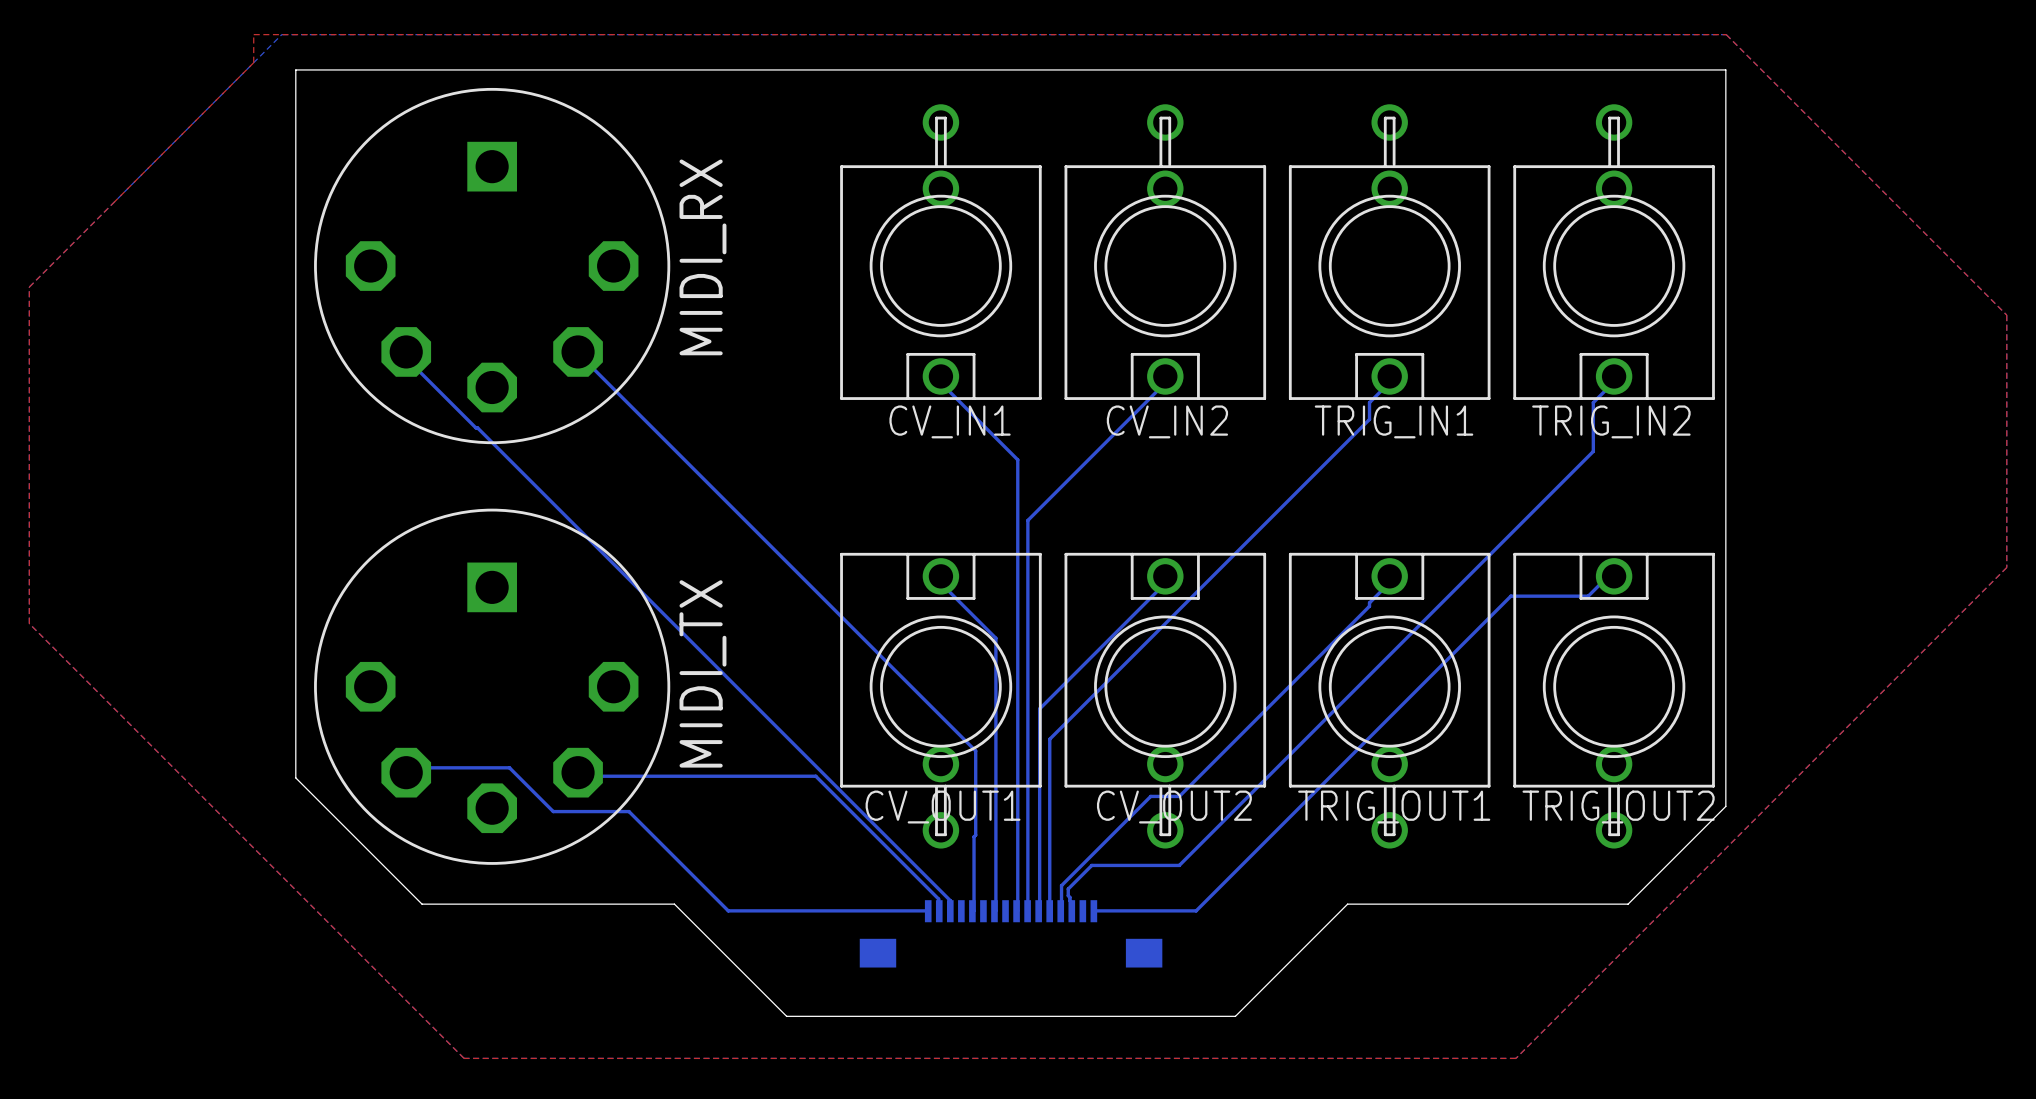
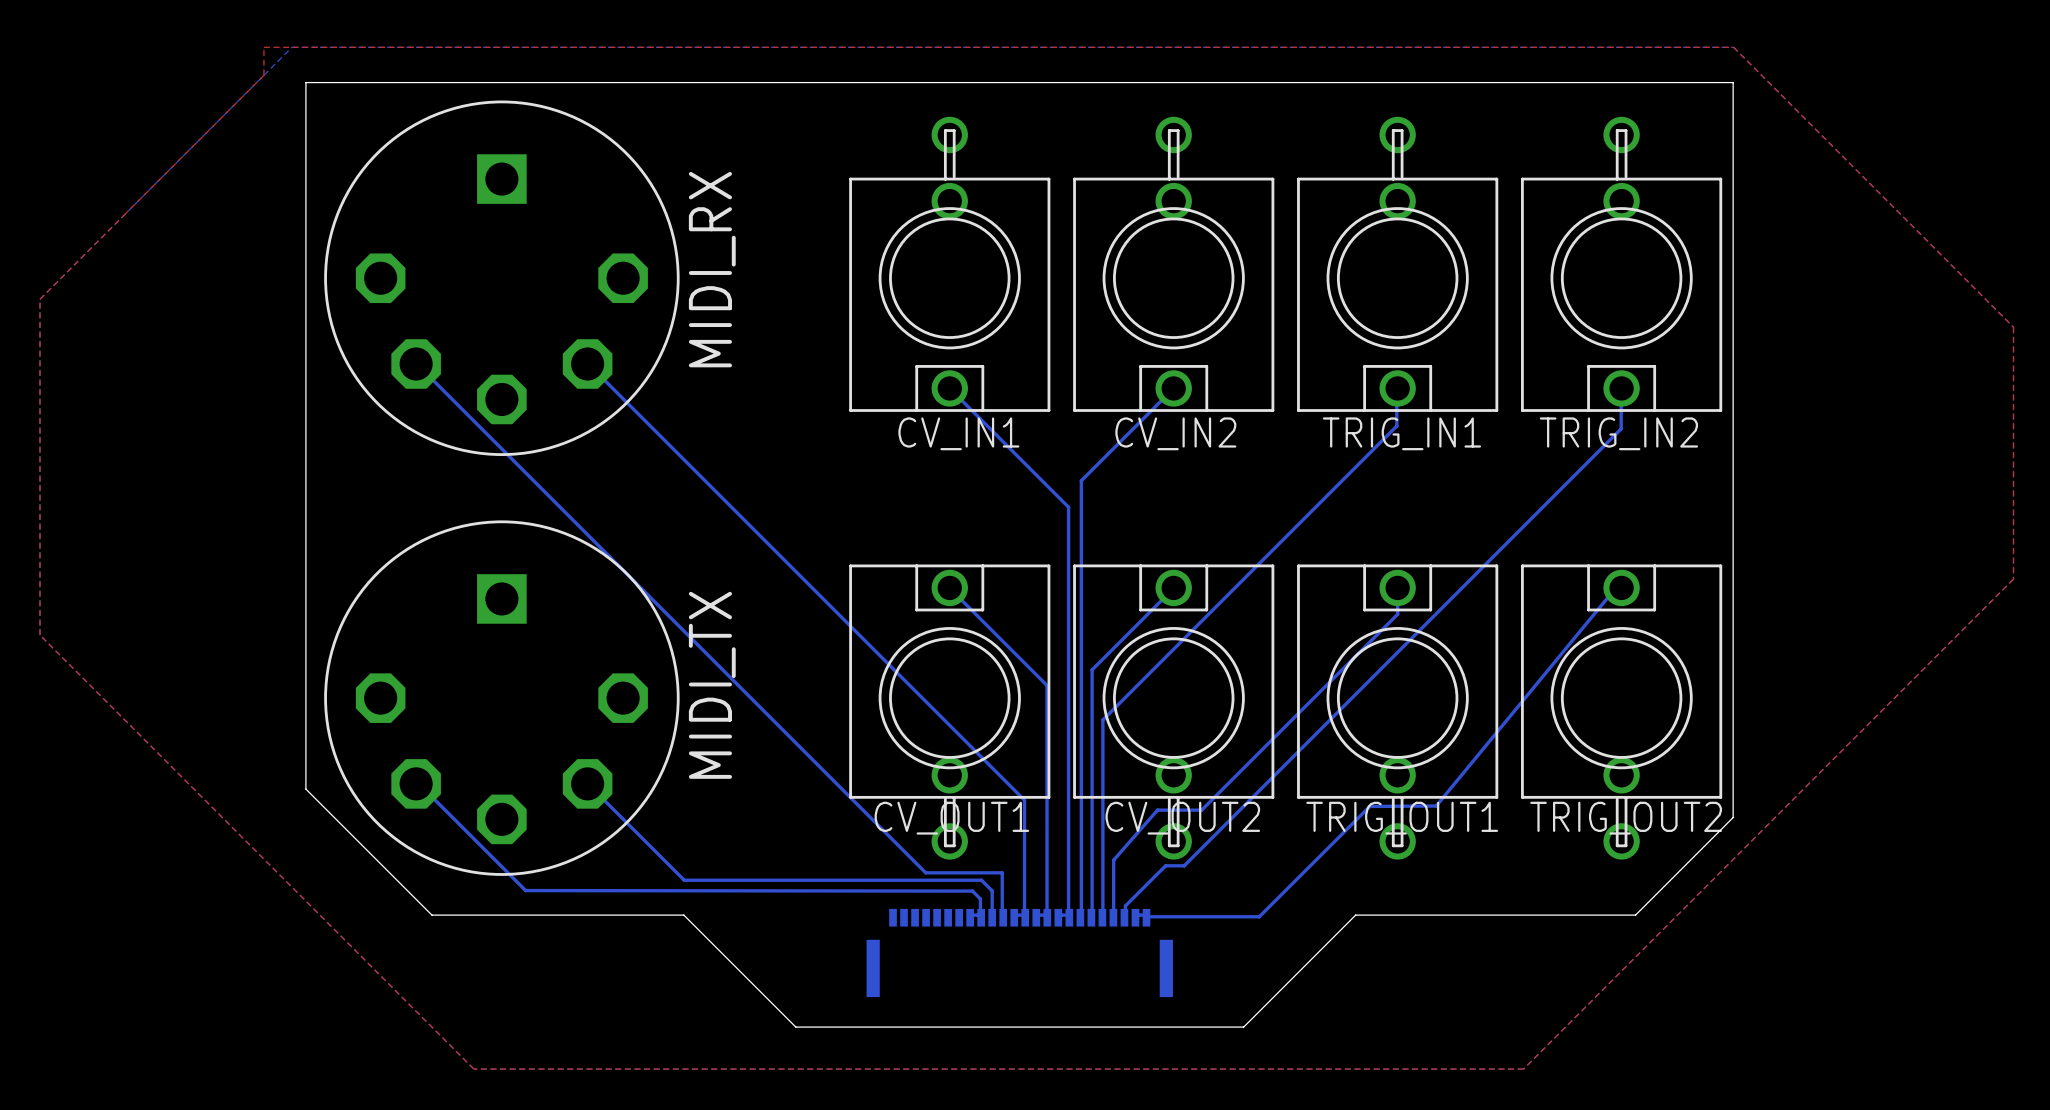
bottom track: (406, 351) (406, 358) (950, 900) (950, 910) -> (416, 363) (925, 872) (1002, 872) (1003, 917)
bottom track: (578, 351) (975, 750) (975, 835) (974, 836) (974, 910) (972, 911) -> (587, 363) (1024, 800) (1025, 917) (1023, 915) (1016, 915) (1014, 917)
bottom track: (940, 376) (942, 384) (1017, 459) (1016, 911) -> (950, 388) (1068, 507) (1069, 917) (1068, 915) (1061, 915) (1058, 917)
bottom track: (1165, 376) (1164, 384) (1027, 520) (1027, 910) -> (1173, 388) (1081, 480) (1080, 917)
bottom track: (1389, 376) (1389, 382) (1369, 402) (1369, 419) (1049, 739) (1049, 910) -> (1397, 388) (1396, 426) (1102, 719) (1102, 917)
bottom track: (1614, 376) (1613, 382) (1593, 402) (1593, 451) (1179, 865) (1091, 865) (1068, 888) (1071, 910) -> (1621, 388) (1621, 428) (1184, 865) (1165, 865) (1125, 905) (1124, 917)
bottom track: (940, 576) (942, 584) (995, 638) (994, 911) -> (949, 587) (1047, 685) (1047, 917) (1044, 915) (1037, 915) (1036, 917)
bottom track: (1165, 576) (1164, 584) (1039, 708) (1038, 911) -> (1173, 587) (1092, 669) (1091, 917)
bottom track: (1614, 576) (1606, 577) (1588, 596) (1510, 596) (1196, 910) (1093, 911) -> (1621, 587) (1615, 588) (1436, 805) (1369, 806) (1259, 916) (1146, 917) (1145, 915) (1138, 915) (1135, 917)
bottom track: (1389, 582) (1369, 602) (1369, 606) (1179, 796) (1150, 796) (1061, 885) (1060, 911) -> (1397, 594) (1397, 614) (1201, 810) (1157, 810) (1113, 860) (1113, 917)
bottom track: (406, 772) (410, 767) (509, 767) (553, 811) (629, 811) (728, 910) (928, 911) -> (416, 783) (424, 789) (525, 890) (972, 891) (980, 899) (981, 917) (977, 915) (970, 915) (970, 917)
bottom track: (581, 776) (815, 776) (938, 899) (939, 911) -> (591, 787) (684, 880) (981, 880) (992, 890) (992, 917)
part footprint: [859, 900, 1163, 968] -> [866, 908, 1173, 998]

